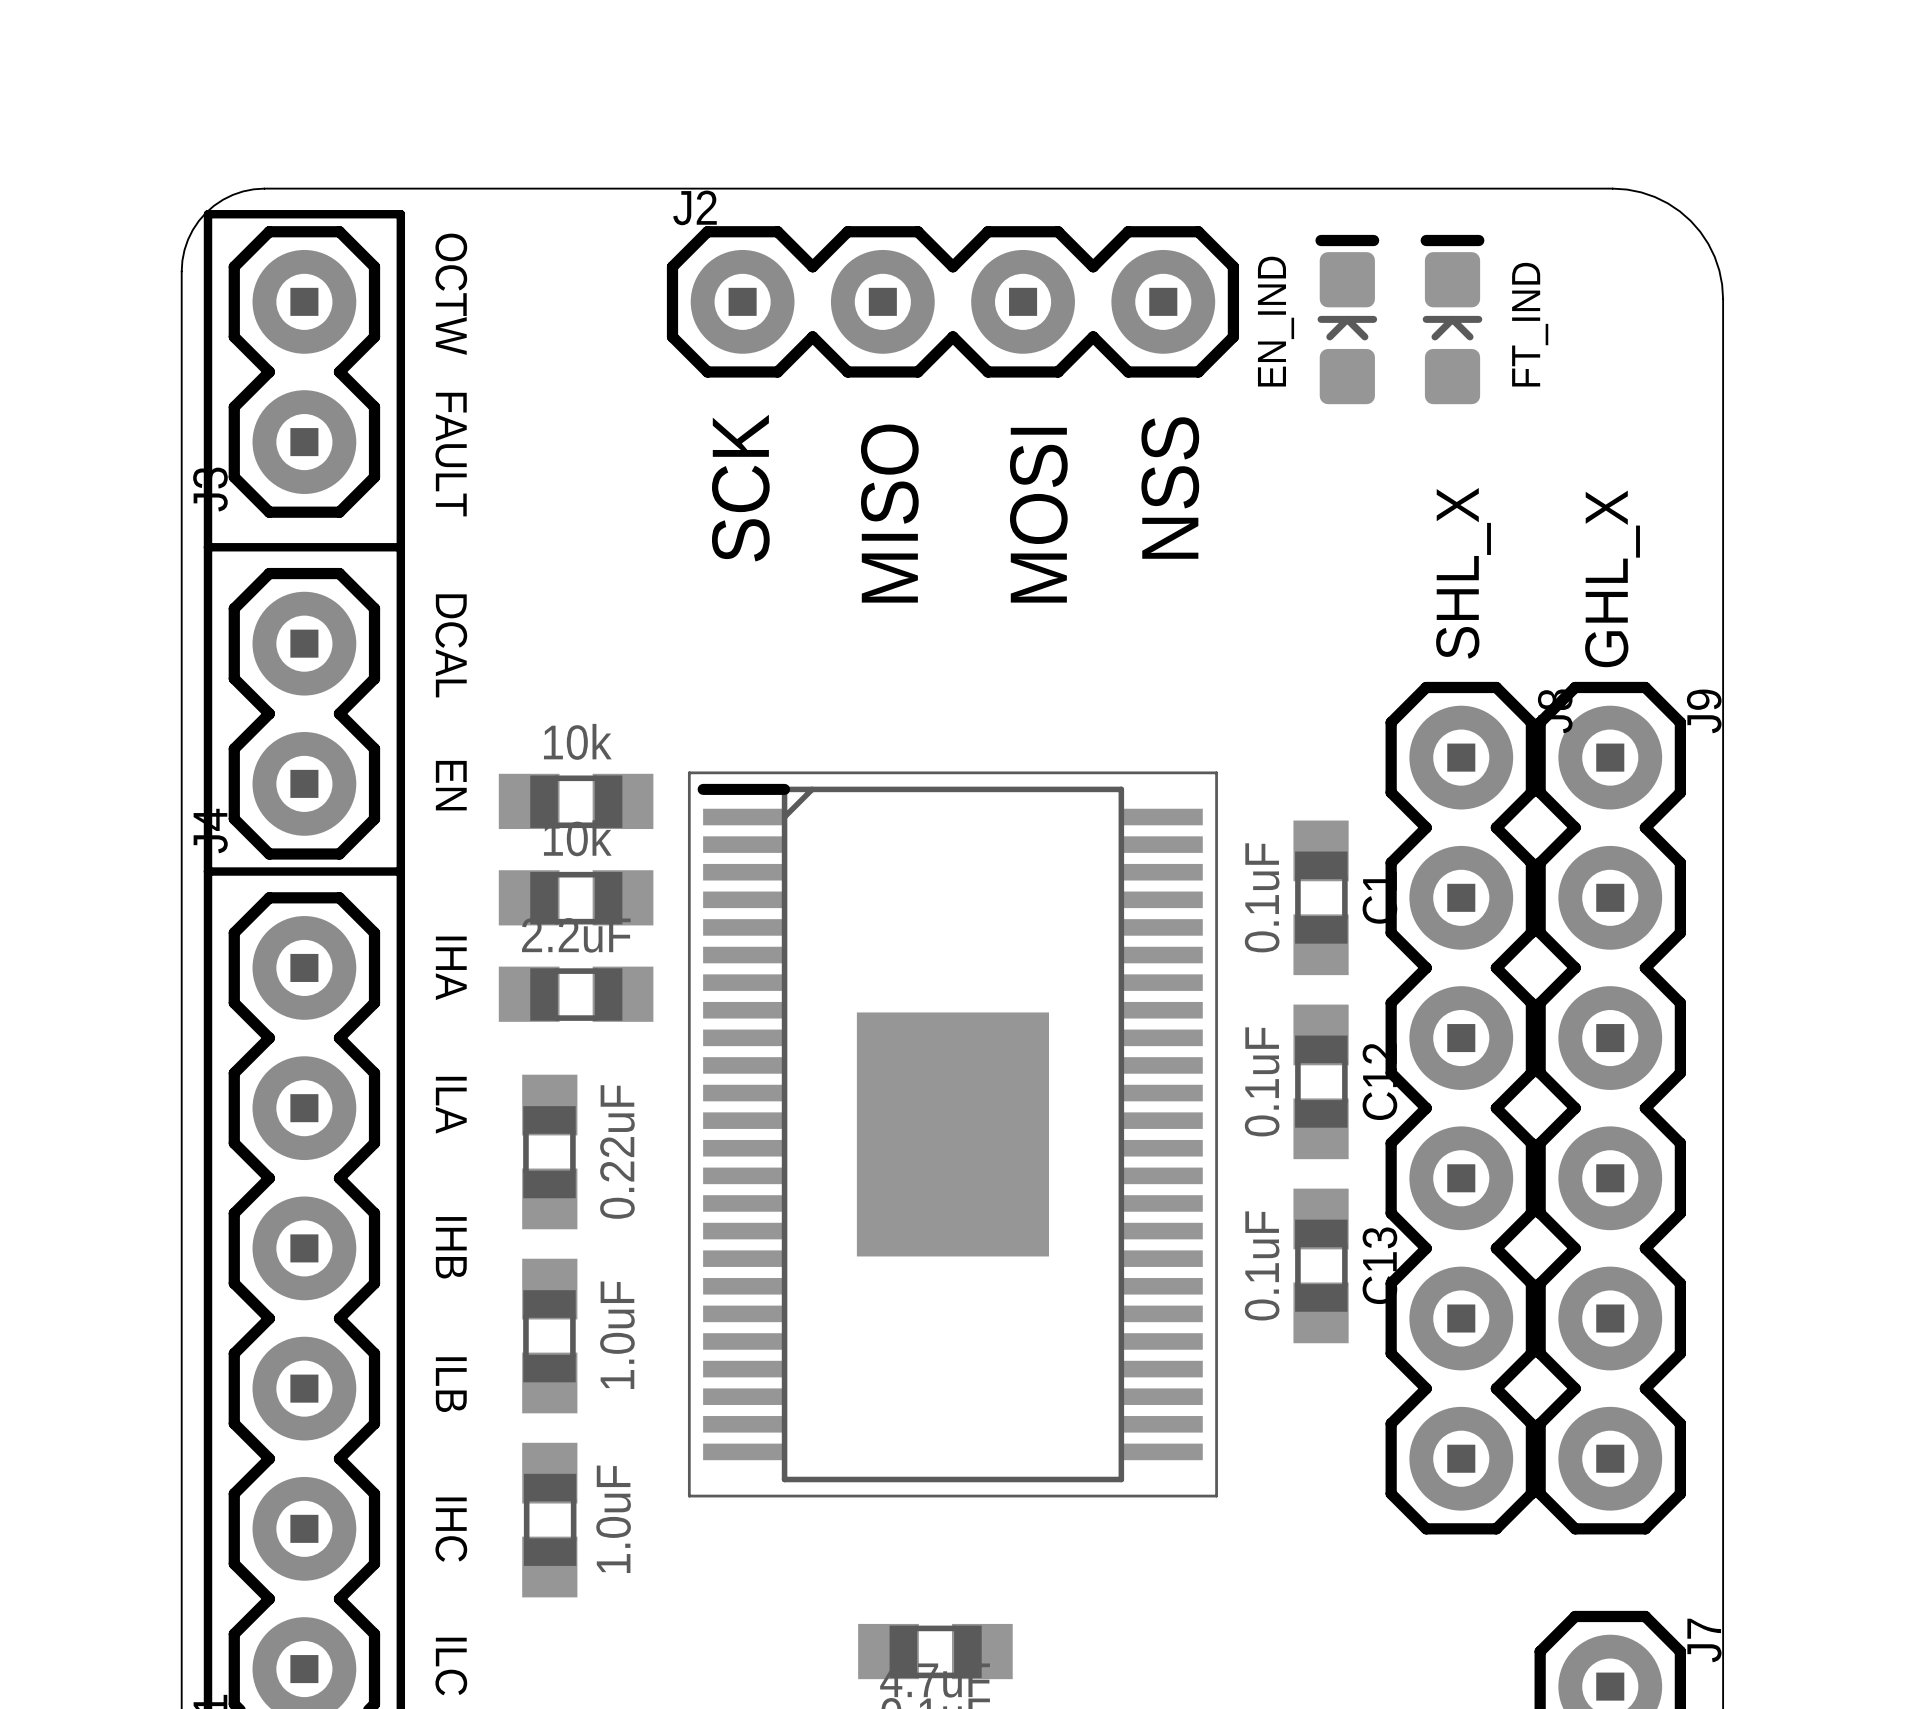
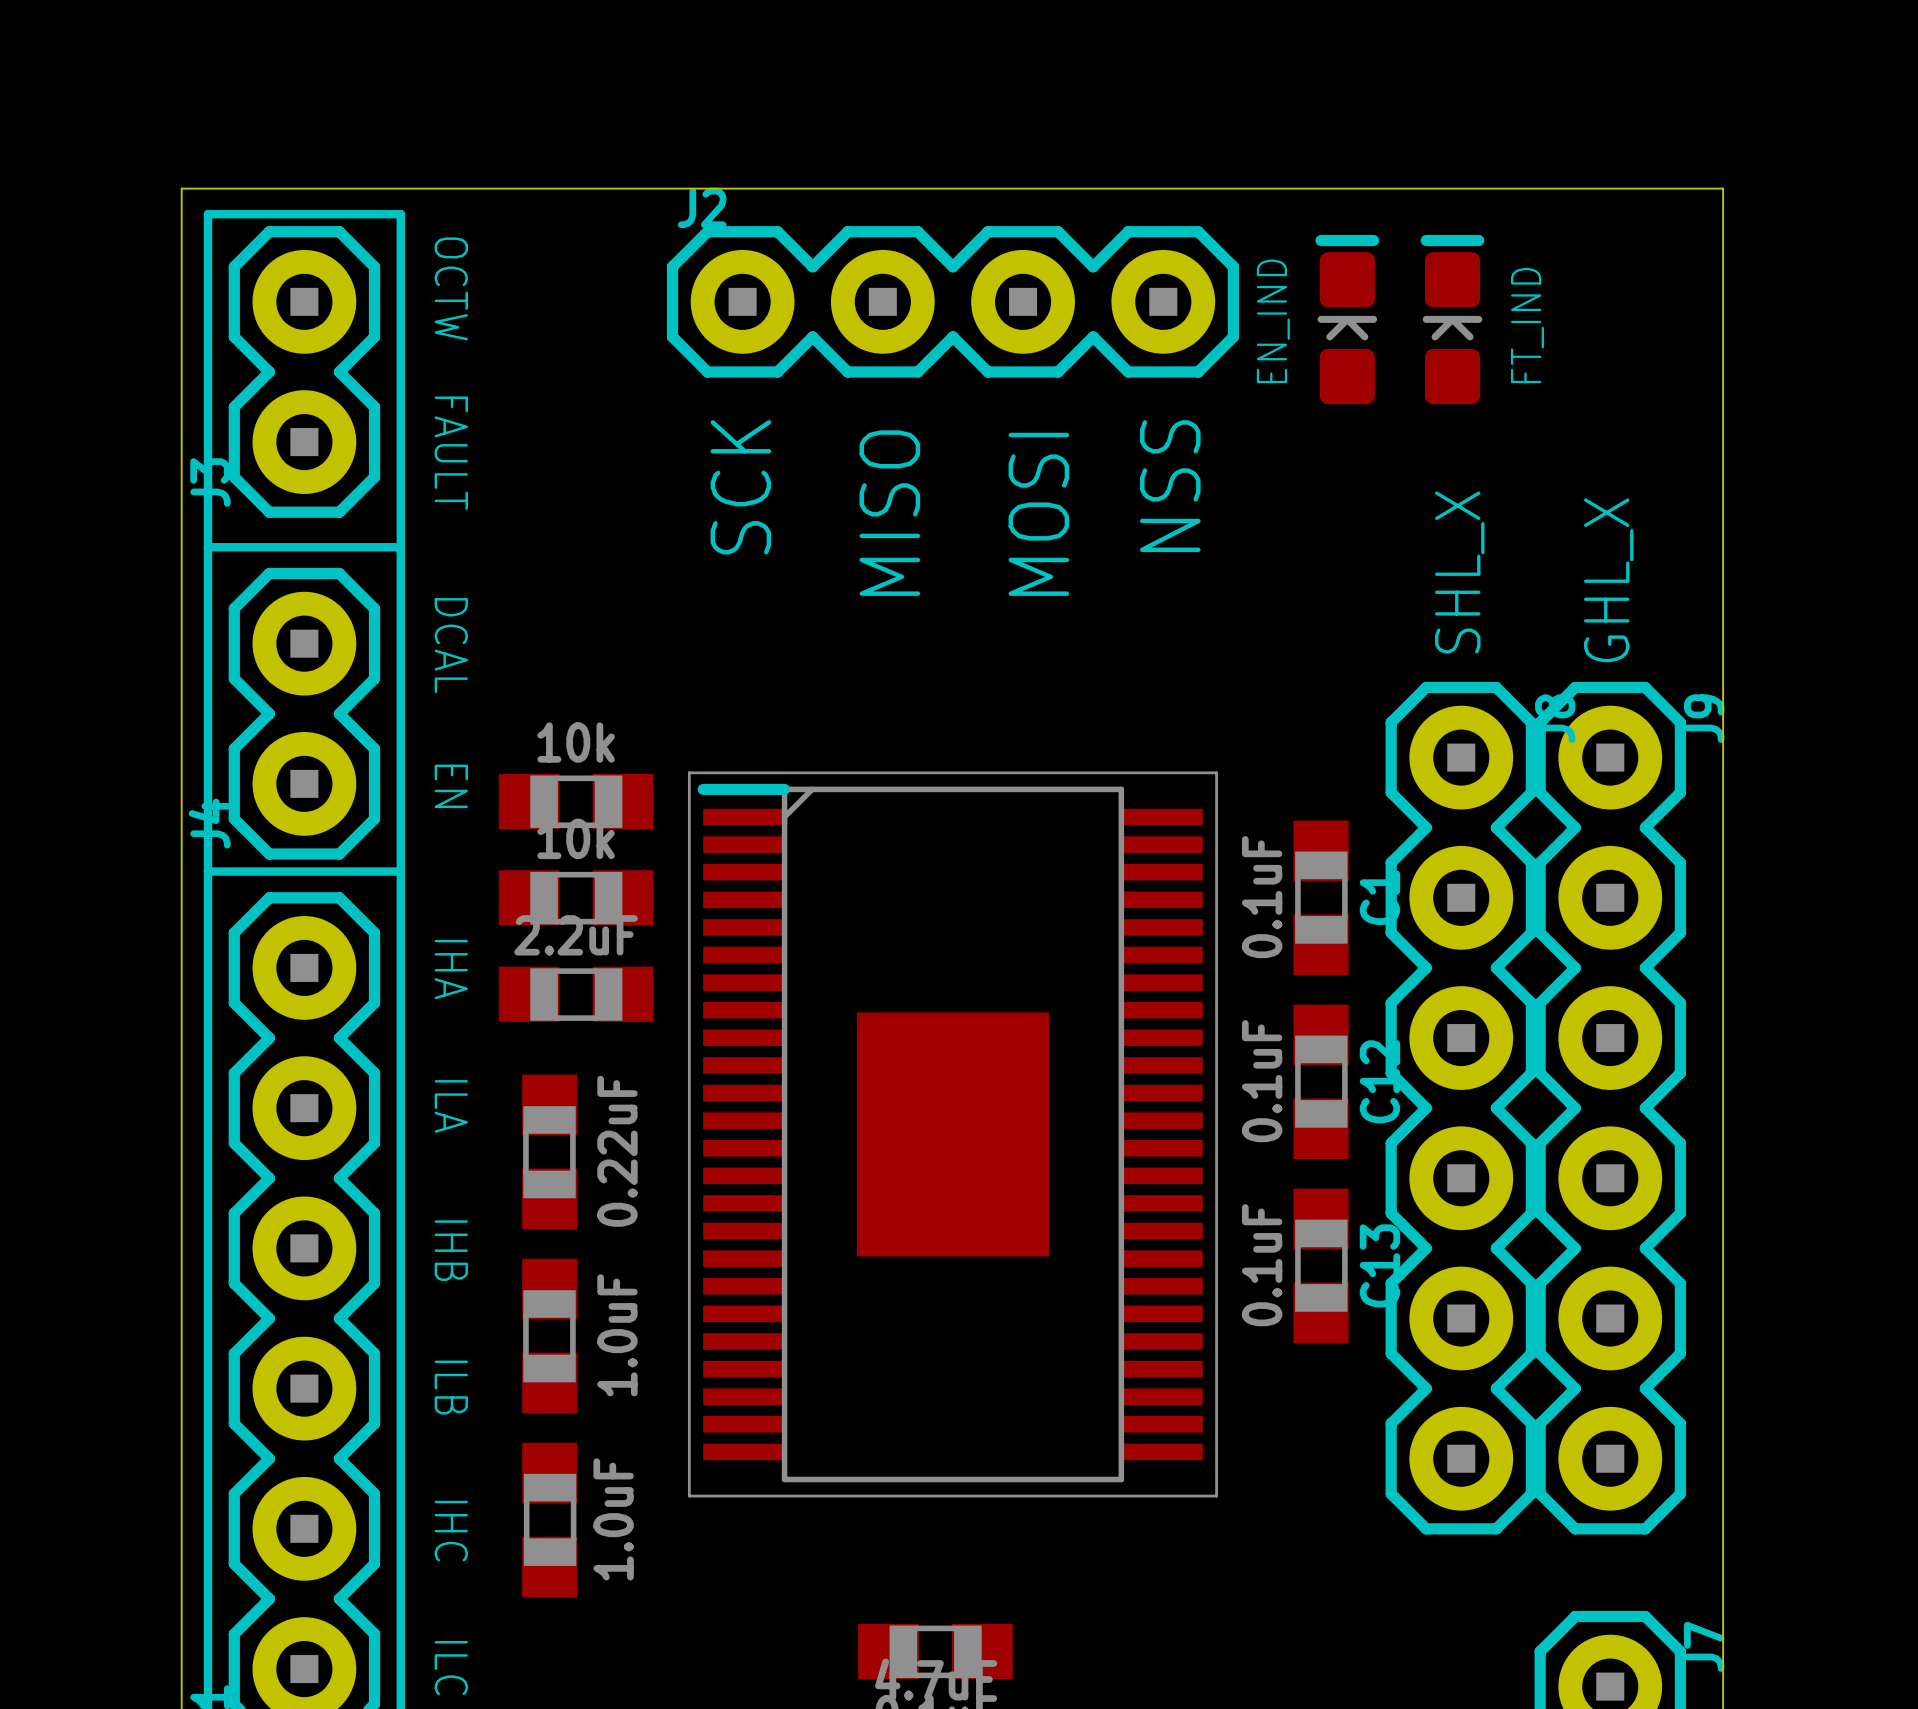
board edge: (264, 188) (232, 194) (205, 212) (188, 239) (181, 271) -> (264, 188) (181, 188) (181, 271)
board edge: (1612, 188) (1641, 192) (1654, 197) (1667, 203) (1690, 220) (1708, 243) (1714, 256) (1719, 270) (1723, 299) -> (1612, 188) (1723, 188) (1723, 299)

